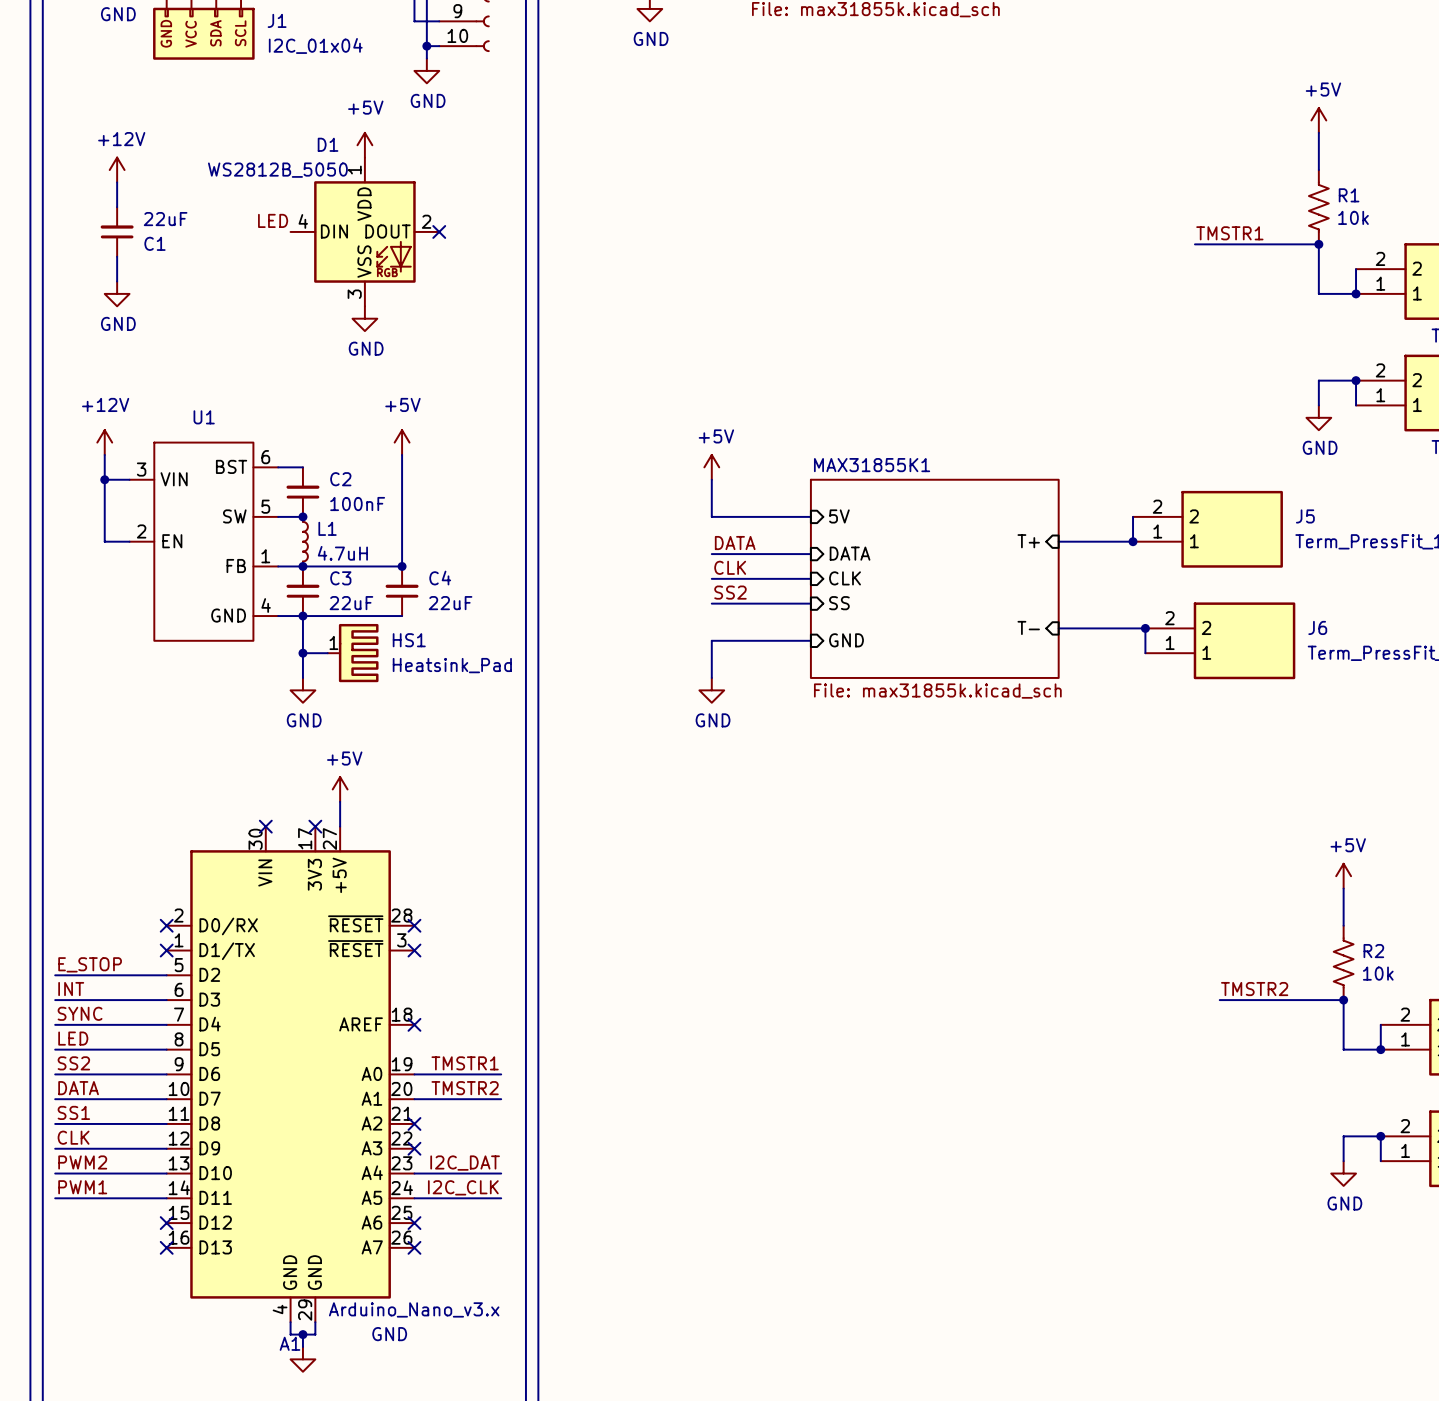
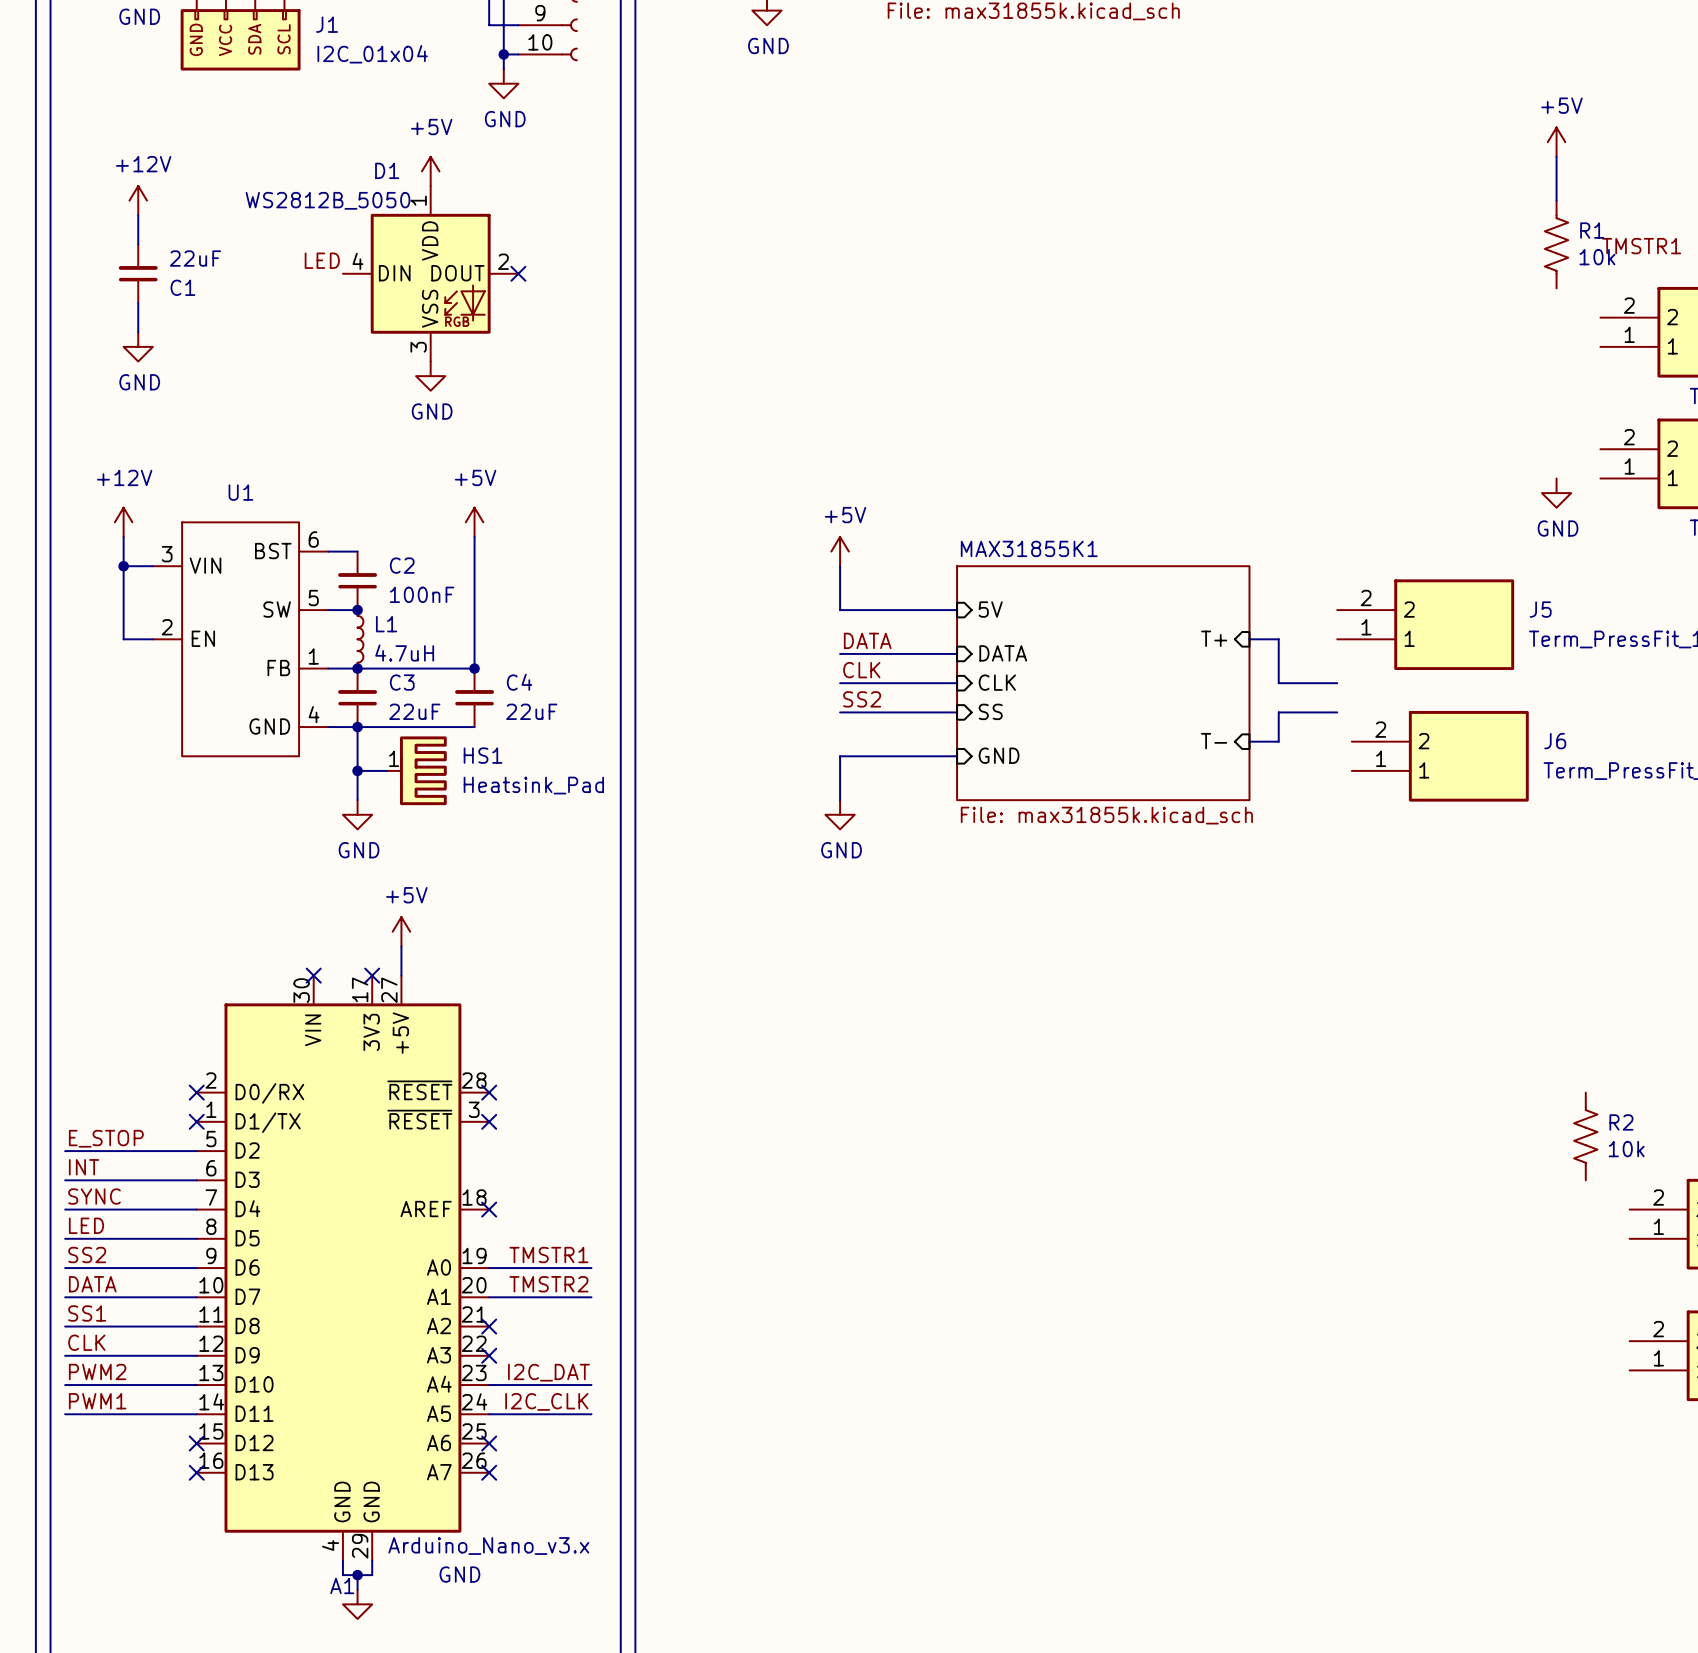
label position: TMSTR1 (1229, 233) -> TMSTR1 (1641, 246)
wire: (1194, 244) (1318, 244) (1318, 293) (1356, 293) (1356, 269) -> none
junction: (1318, 244) -> none
junction: (1356, 293) -> none
junction: (1356, 380) -> none
wire: (1318, 405) (1318, 380) (1356, 380) (1356, 405) -> none
wire: (1133, 516) (1133, 541) (1083, 541) -> (1337, 683) (1278, 683) (1278, 639)
junction: (1133, 541) -> none
wire: (1083, 628) (1145, 628) (1145, 653) -> (1278, 741) (1278, 712) (1337, 712)
junction: (1145, 628) -> none
power symbol: +5V (1343, 876) -> none
wire: (1343, 888) (1343, 925) -> none
label: TMSTR2 (1254, 989) -> none
wire: (1219, 1000) (1343, 1000) (1343, 1049) (1380, 1049) (1380, 1024) -> none
junction: (1343, 1000) -> none
junction: (1380, 1049) -> none
junction: (1380, 1136) -> none
wire: (1343, 1161) (1343, 1136) (1380, 1136) (1380, 1161) -> none
power symbol: GND (1343, 1173) -> none

